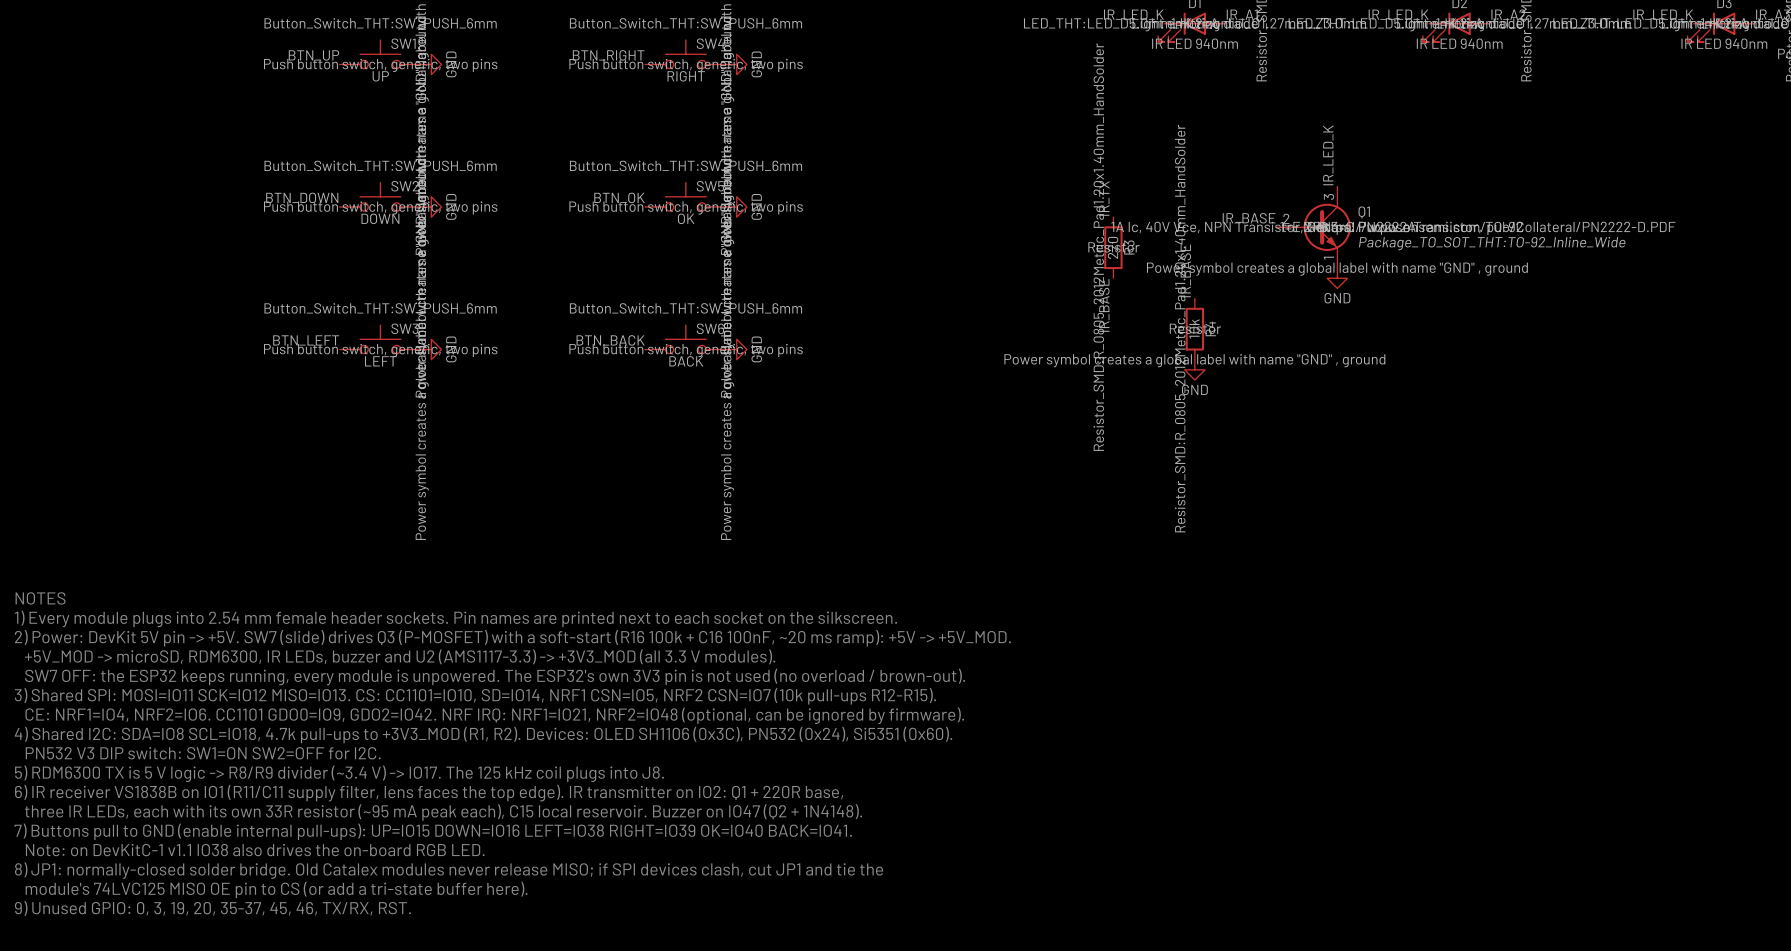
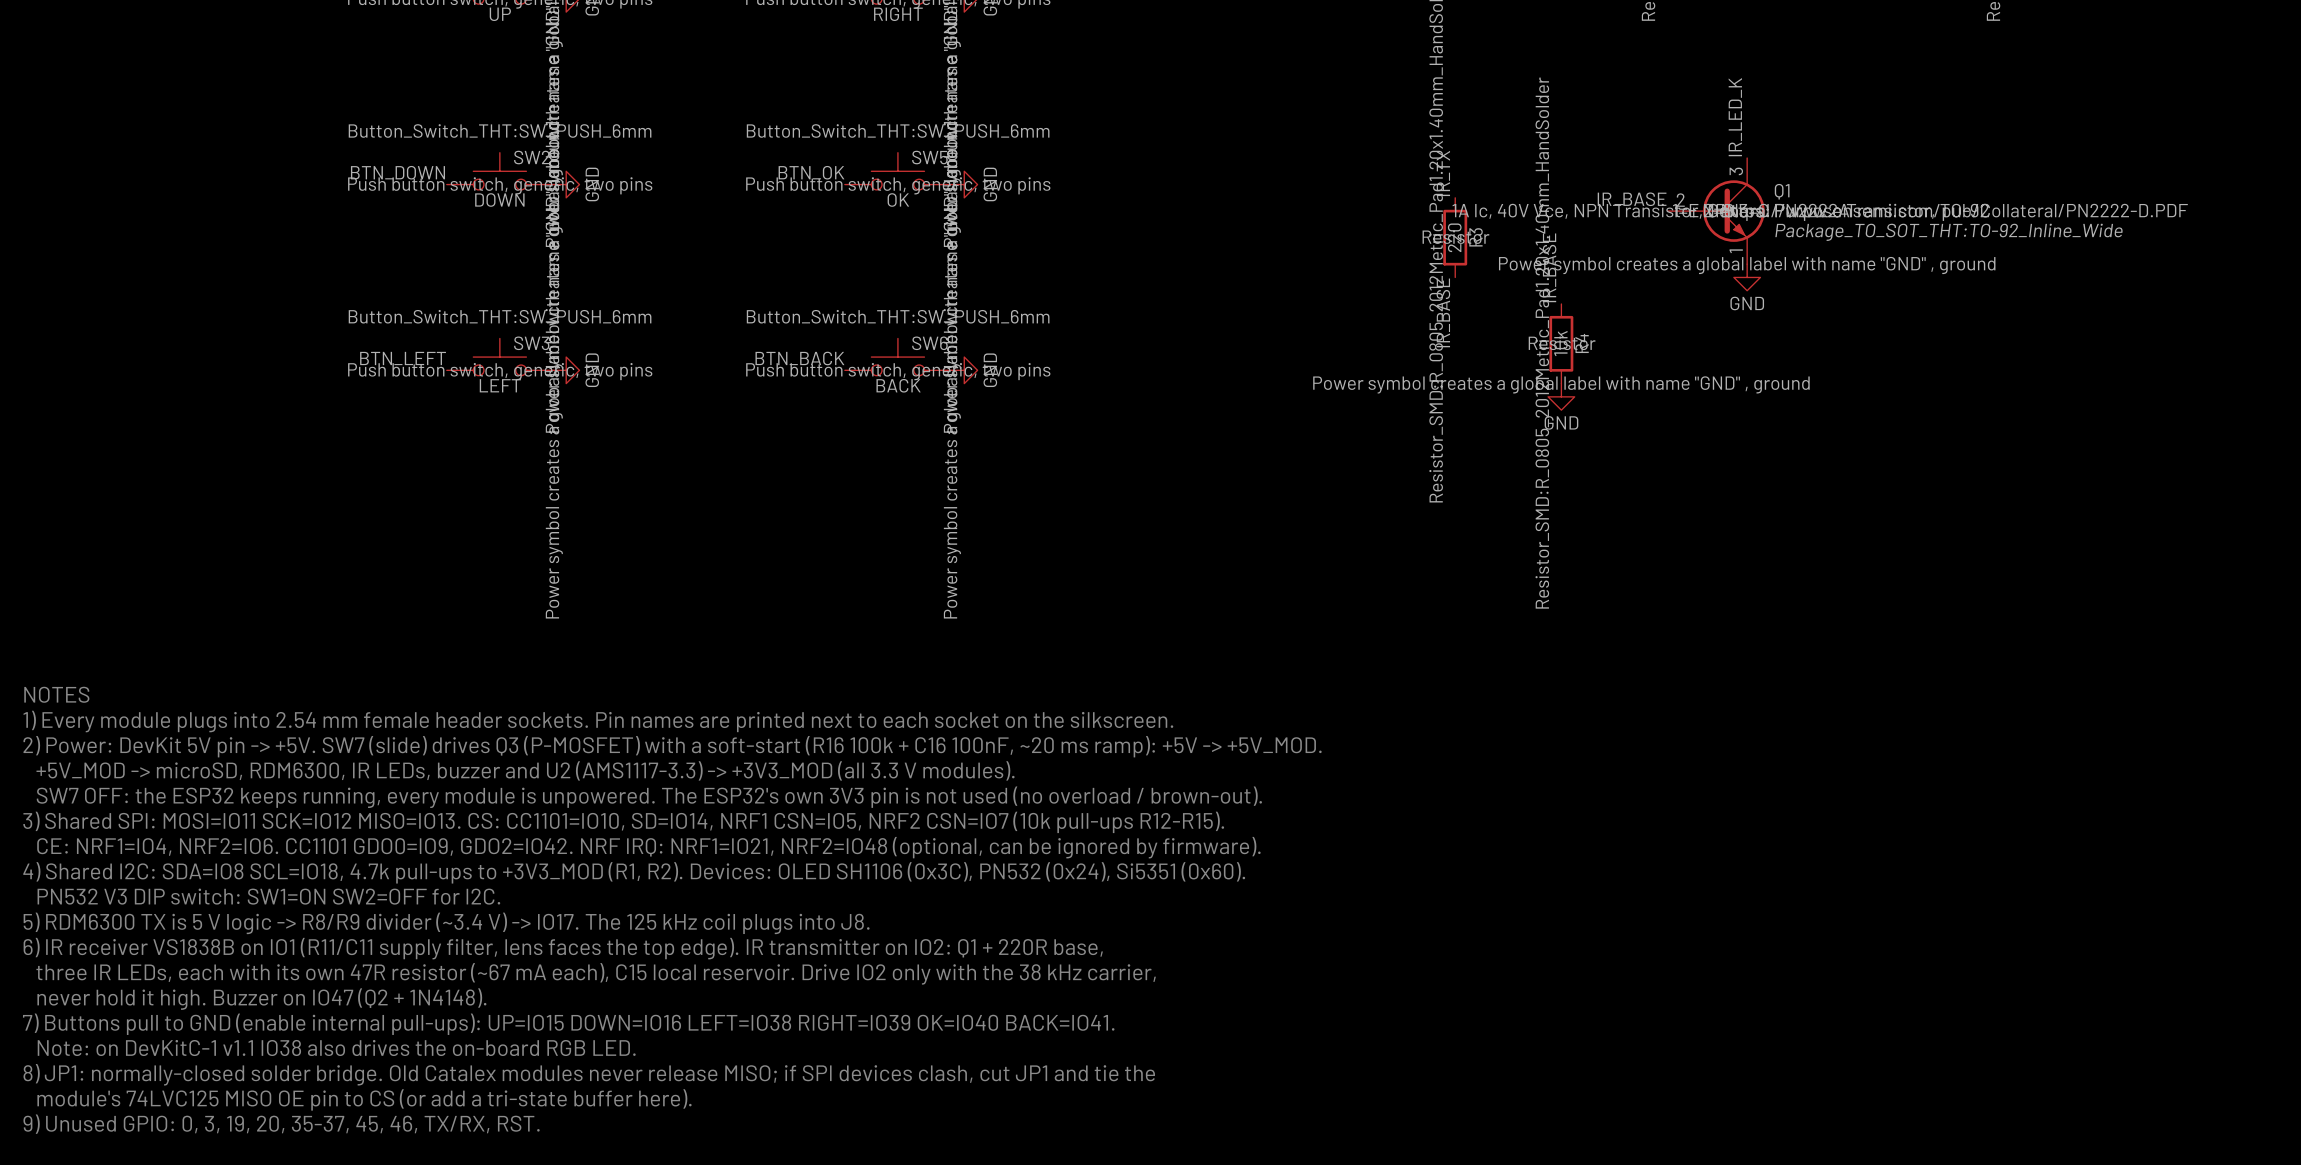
text: three IR LEDs, each with its own 33R resistor (~95 mA peak each), C15 local reservoir. Buzzer on IO47 (Q2 + 1N4148). (443, 812) -> three IR LEDs, each with its own 47R resistor (~67 mA each), C15 local reservoir. Drive IO2 only with the 38 kHz carrier, (596, 973)
text: 7) Buttons pull to GND (enable internal pull-ups): UP=IO15 DOWN=IO16 LEFT=IO38 RIGHT=IO39 OK=IO40 BACK=IO41. (433, 831) -> never hold it high. Buzzer on IO47 (Q2 + 1N4148). (261, 999)
text: Note: on DevKitC-1 v1.1 IO38 also drives the on-board RGB LED. (255, 850) -> 7) Buttons pull to GND (enable internal pull-ups): UP=IO15 DOWN=IO16 LEFT=IO38 RIGHT=IO39 OK=IO40 BACK=IO41. (568, 1024)
text: 8) JP1: normally-closed solder bridge. Old Catalex modules never release MISO; if SPI devices clash, cut JP1 and tie the (449, 870) -> Note: on DevKitC-1 v1.1 IO38 also drives the on-board RGB LED. (336, 1048)
text: module's 74LVC125 MISO OE pin to CS (or add a tri-state buffer here). (276, 889) -> 8) JP1: normally-closed solder bridge. Old Catalex modules never release MISO; if SPI devices clash, cut JP1 and tie the (589, 1074)
text: 9) Unused GPIO: 0, 3, 19, 20, 35-37, 45, 46, TX/RX, RST. (212, 908) -> module's 74LVC125 MISO OE pin to CS (or add a tri-state buffer here). (364, 1099)
text: none -> 9) Unused GPIO: 0, 3, 19, 20, 35-37, 45, 46, TX/RX, RST. (281, 1124)

